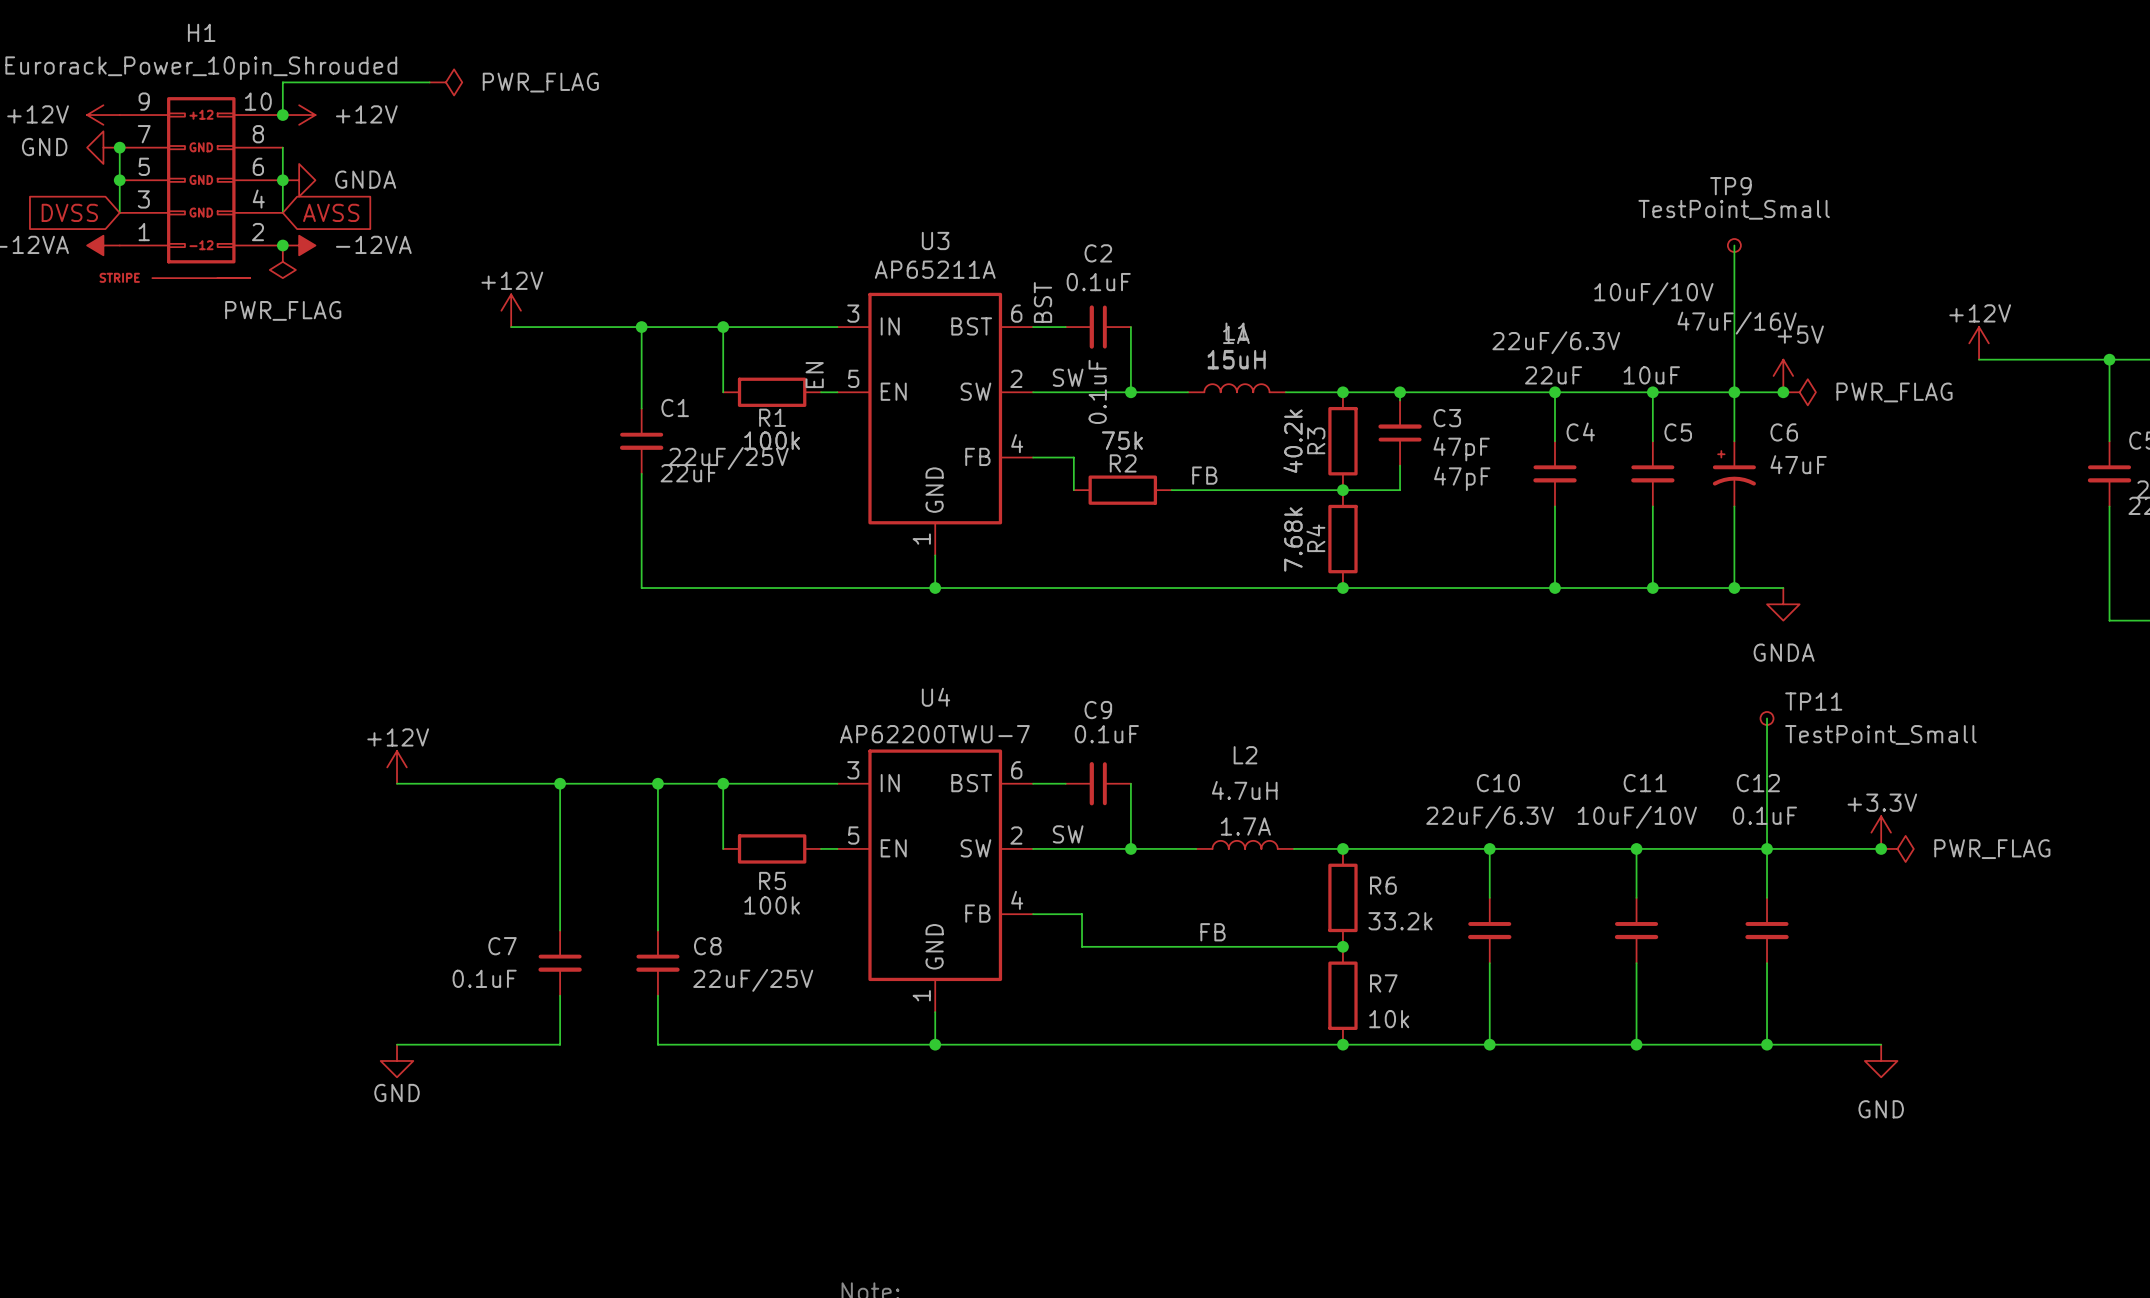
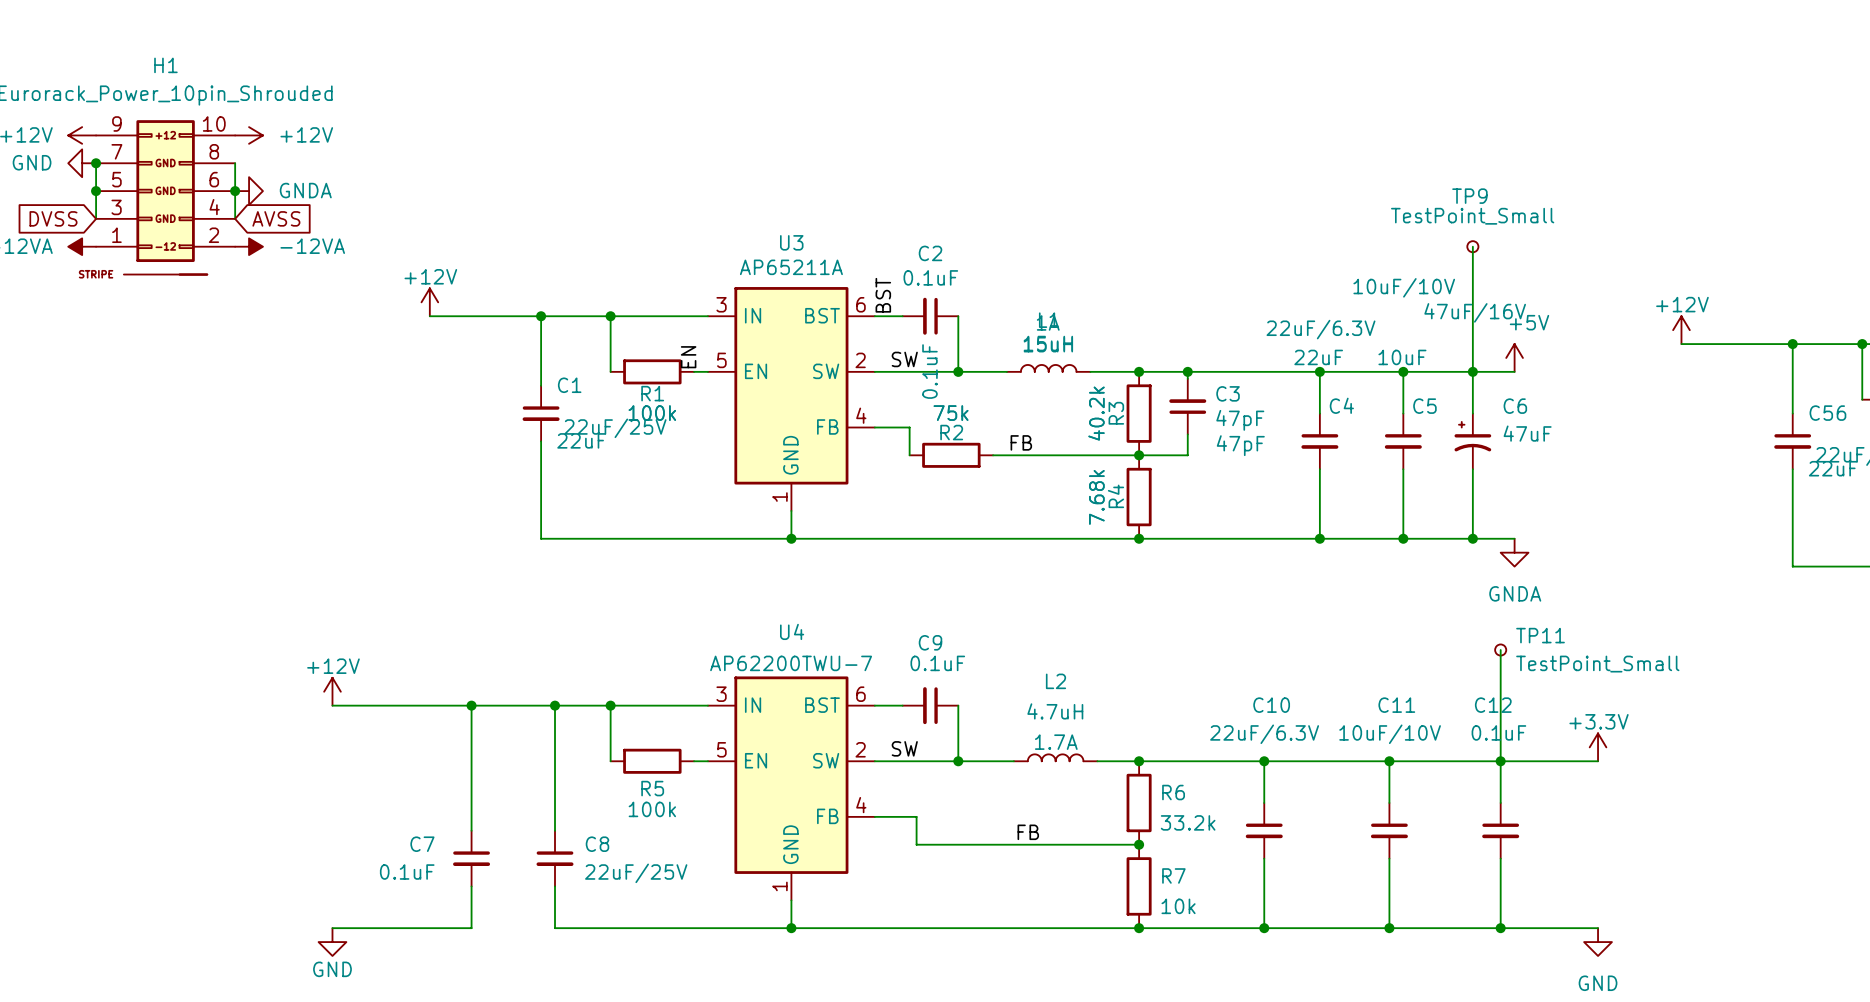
wire: (429, 82) (282, 82) (282, 115) -> none
power symbol: PWR_FLAG (445, 82) -> none
junction: (282, 115) -> none
junction: (282, 245) -> none
power symbol: PWR_FLAG (282, 261) -> none
junction: (1783, 392) -> none
power symbol: PWR_FLAG (1799, 392) -> none
junction: (1881, 848) -> none
power symbol: PWR_FLAG (1897, 848) -> none

